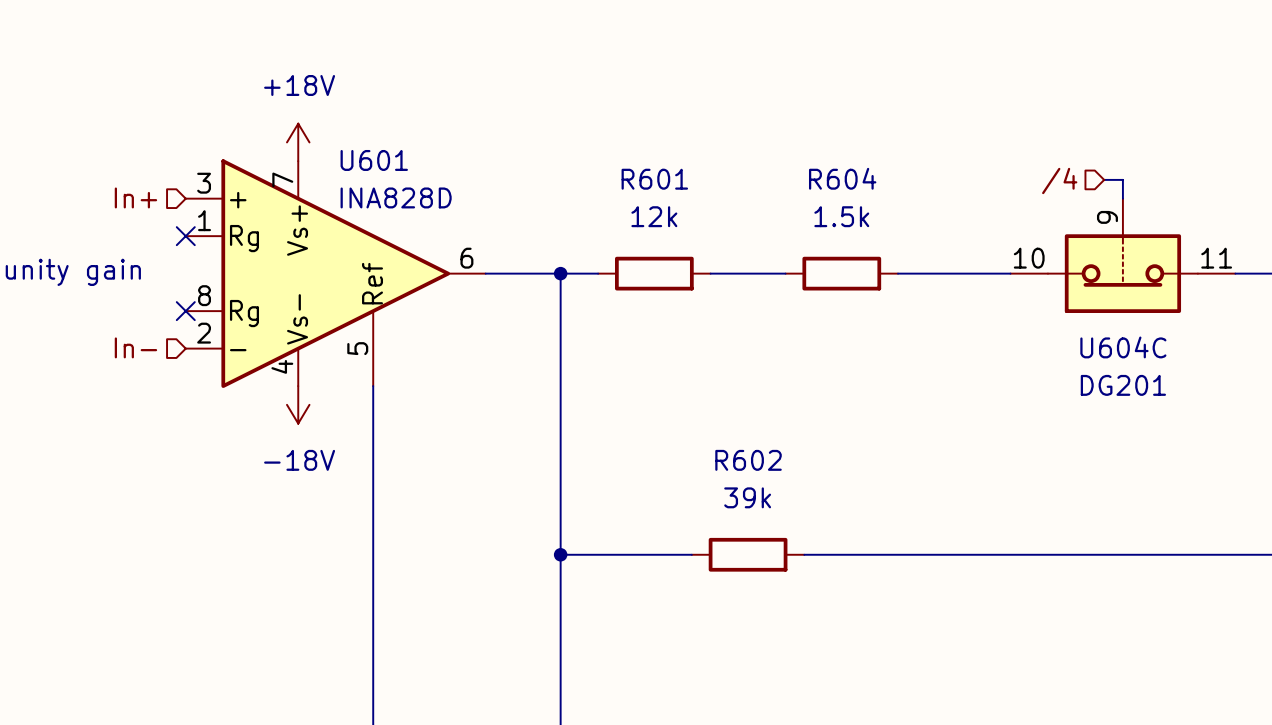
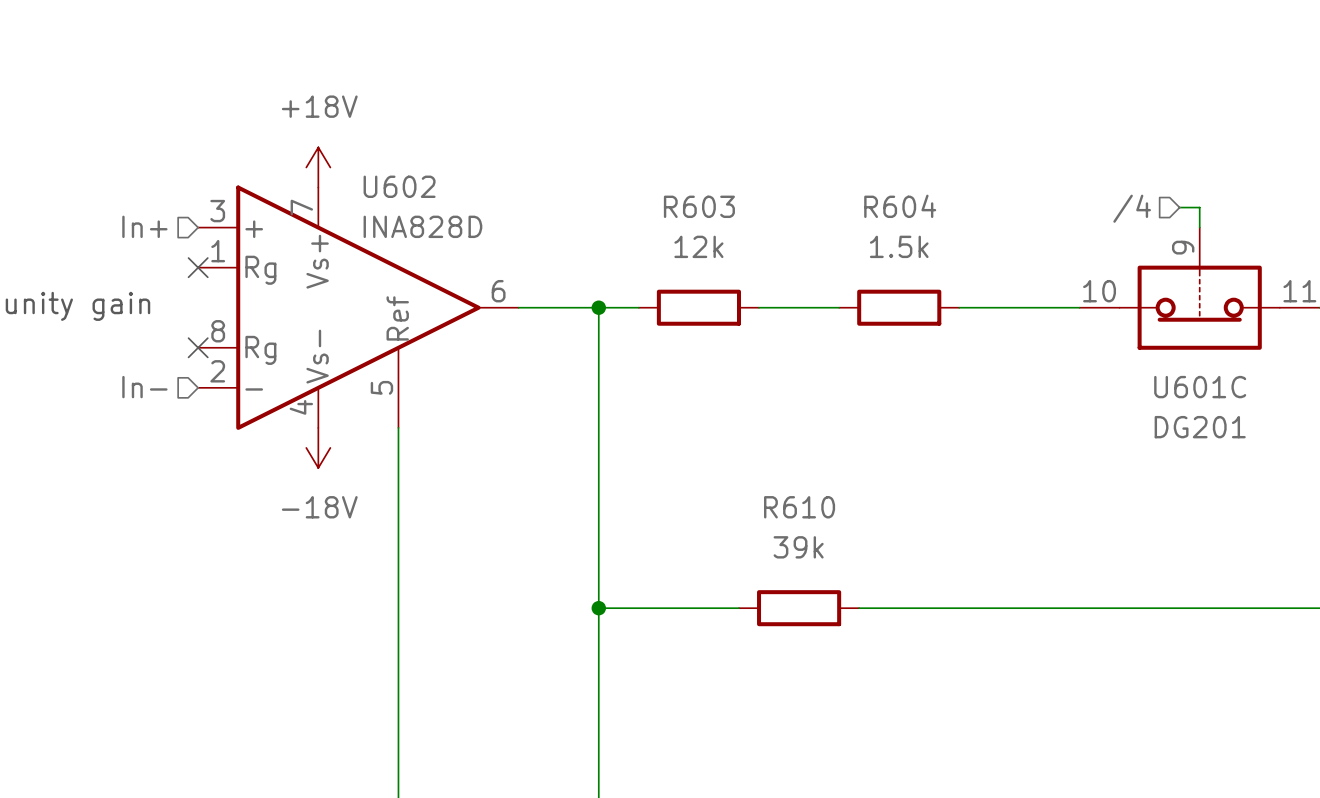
U601 name: U601 (374, 160) -> U602 (399, 186)
R601 name: R601 (654, 179) -> R603 (699, 206)
U604C name: U604C (1123, 347) -> U601C (1200, 387)
R602 name: R602 (748, 460) -> R610 (799, 507)

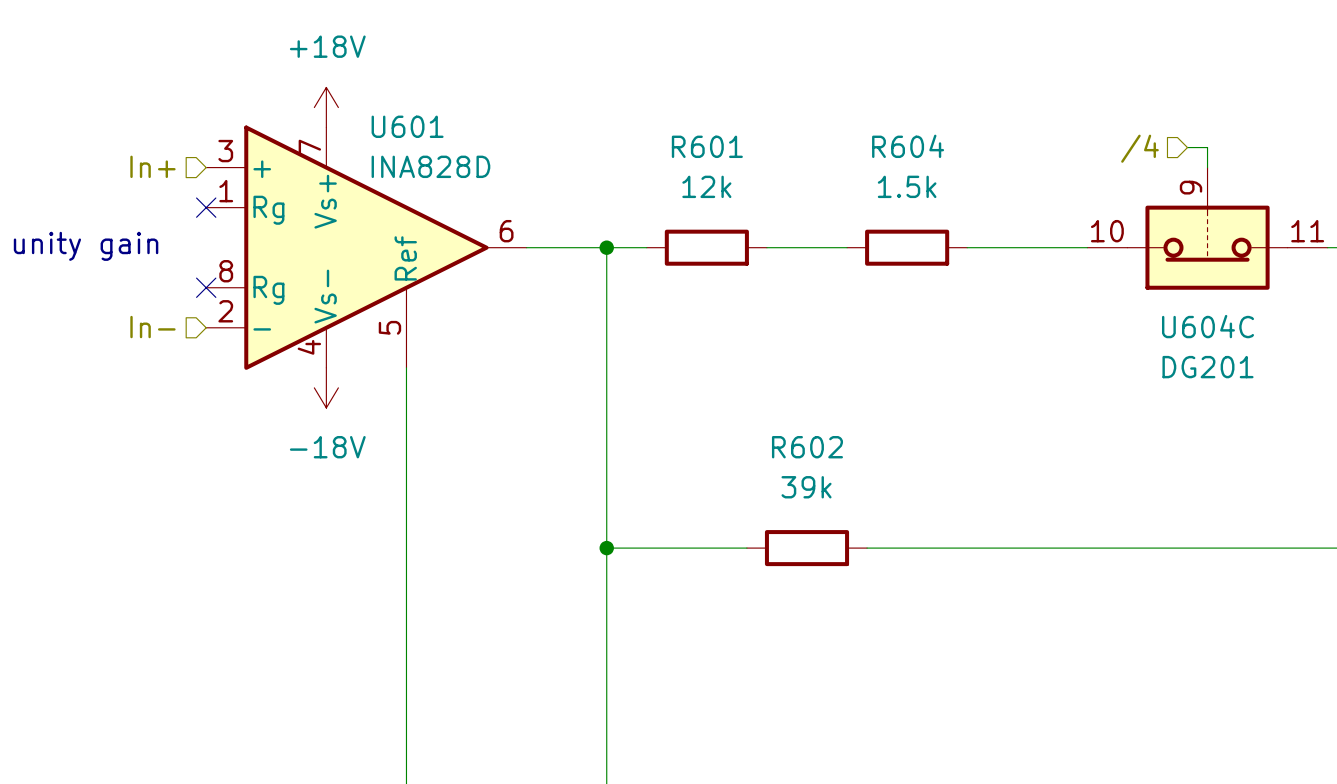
U602 name: U602 (399, 186) -> U601 (407, 126)
R603 name: R603 (699, 206) -> R601 (707, 146)
U601C name: U601C (1200, 387) -> U604C (1208, 326)
R610 name: R610 (799, 507) -> R602 (807, 447)

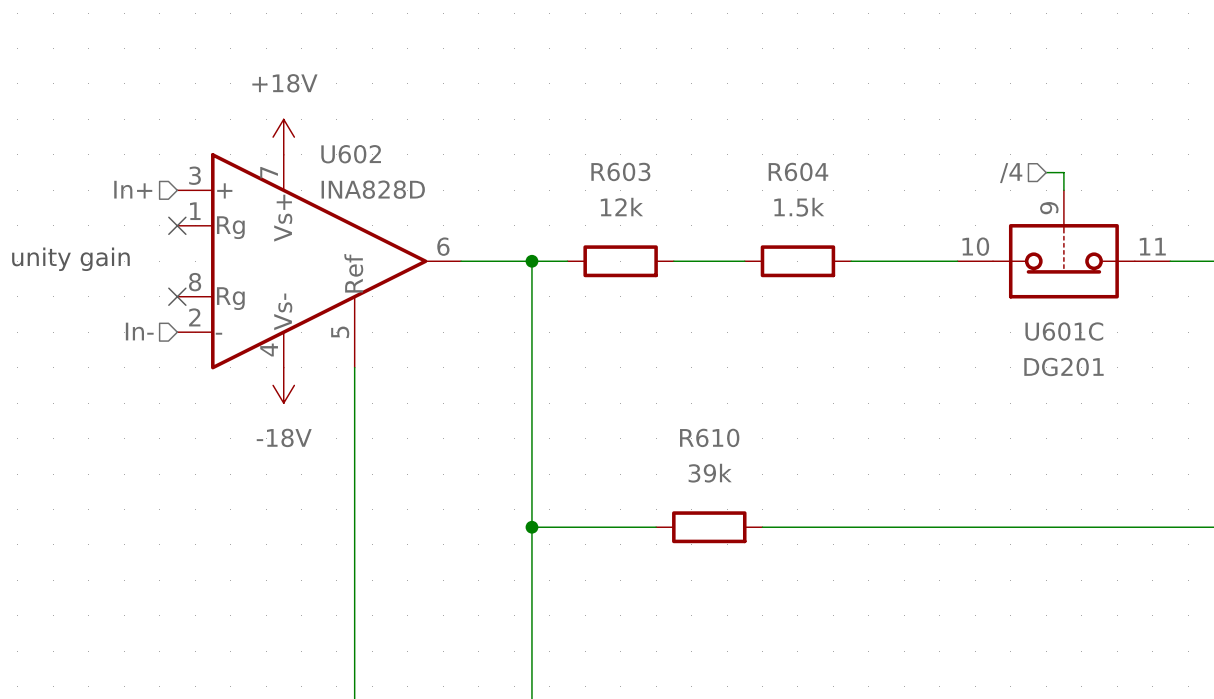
U601 name: U601 (407, 126) -> U602 (351, 154)
R601 name: R601 (707, 146) -> R603 (620, 171)
U604C name: U604C (1208, 326) -> U601C (1064, 331)
R602 name: R602 (807, 447) -> R610 (709, 437)

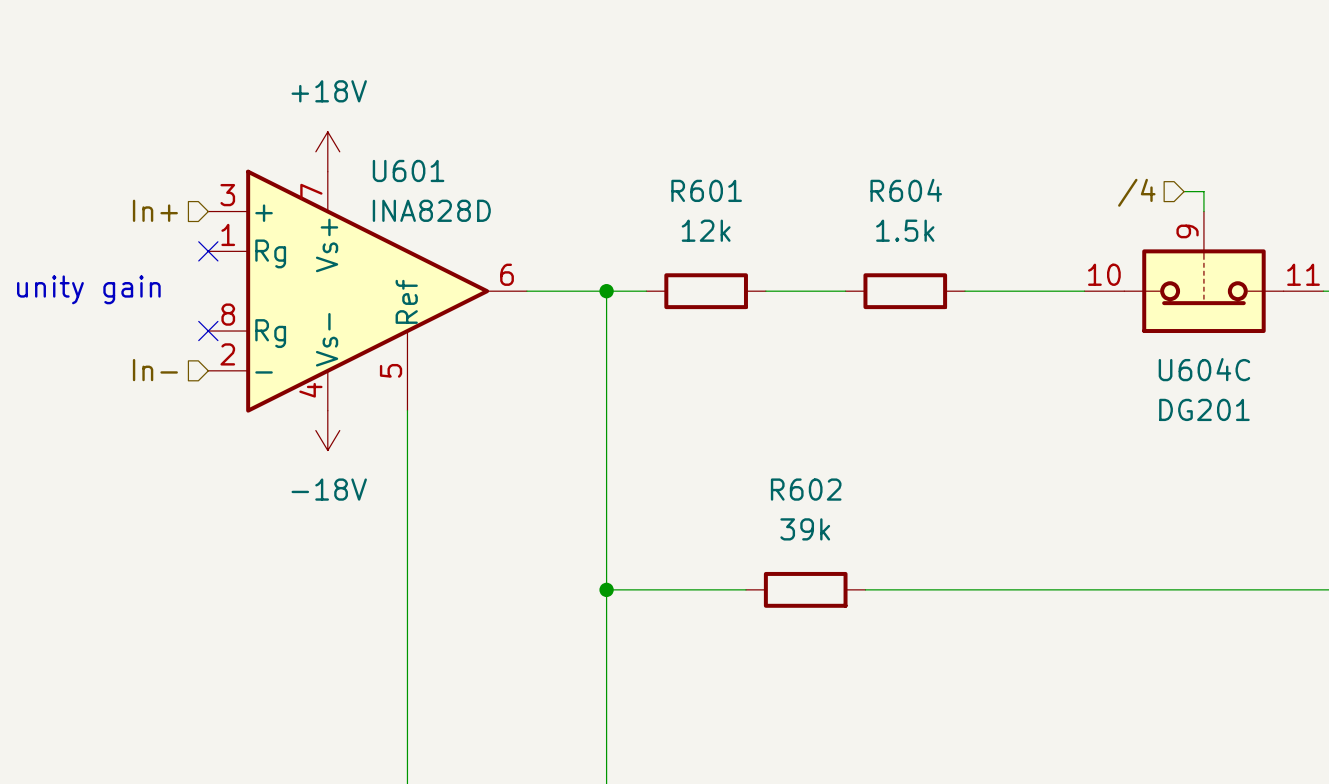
U602 name: U602 (351, 154) -> U601 (408, 170)
R603 name: R603 (620, 171) -> R601 (706, 190)
U601C name: U601C (1064, 331) -> U604C (1204, 369)
R610 name: R610 (709, 437) -> R602 (806, 489)

